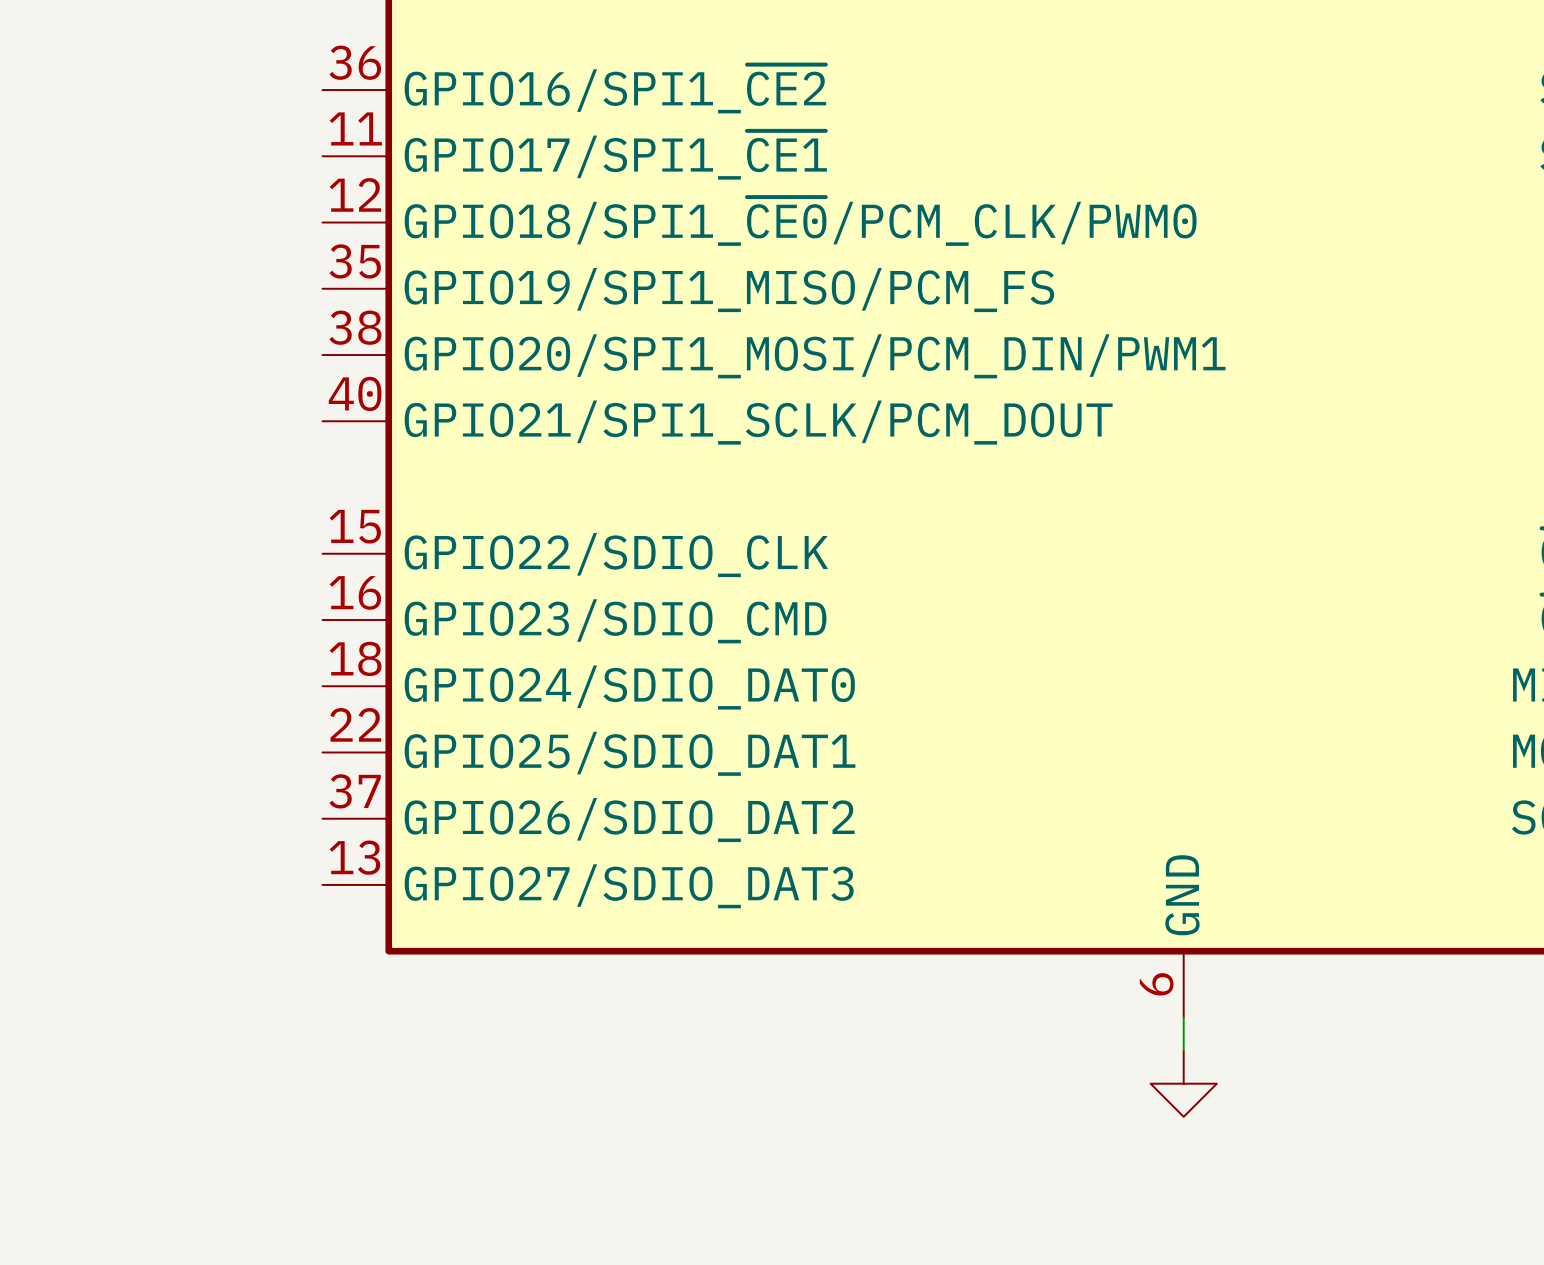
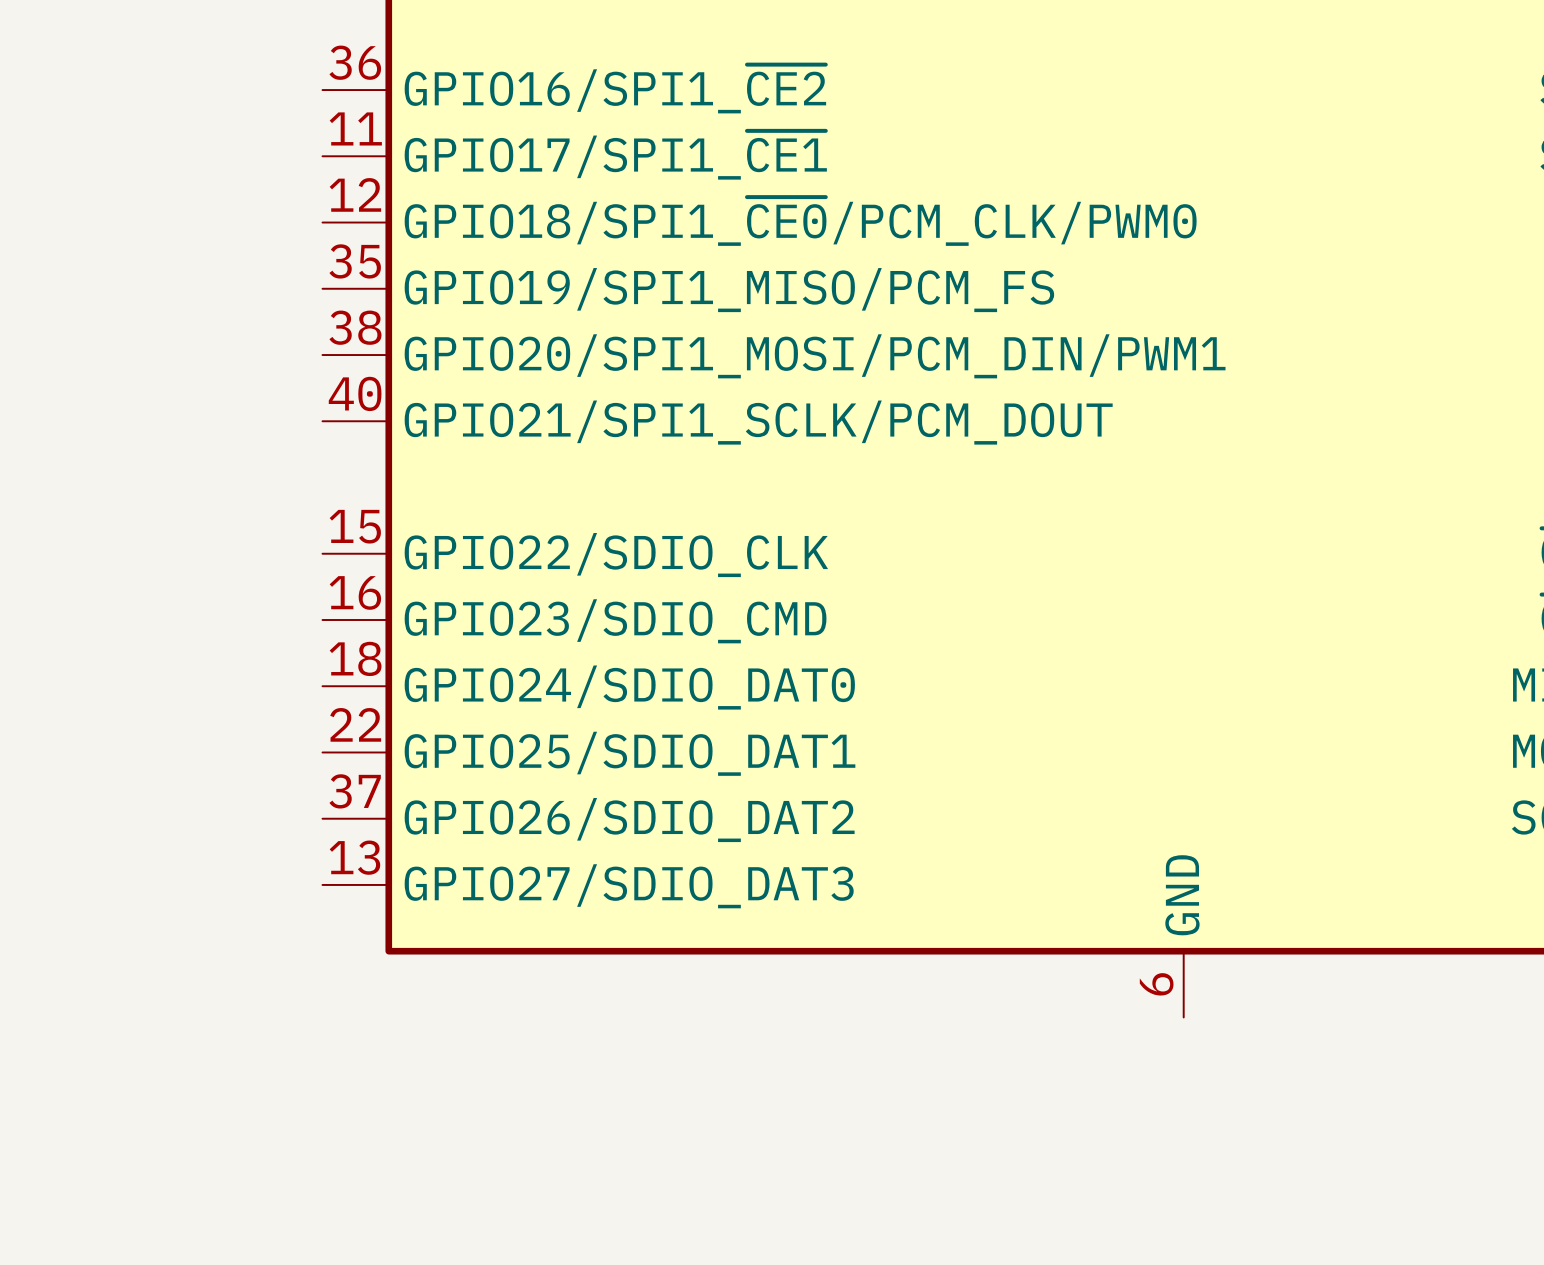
wire: (1183, 1017) (1183, 1050) -> none
power symbol: (1183, 1083) -> none

